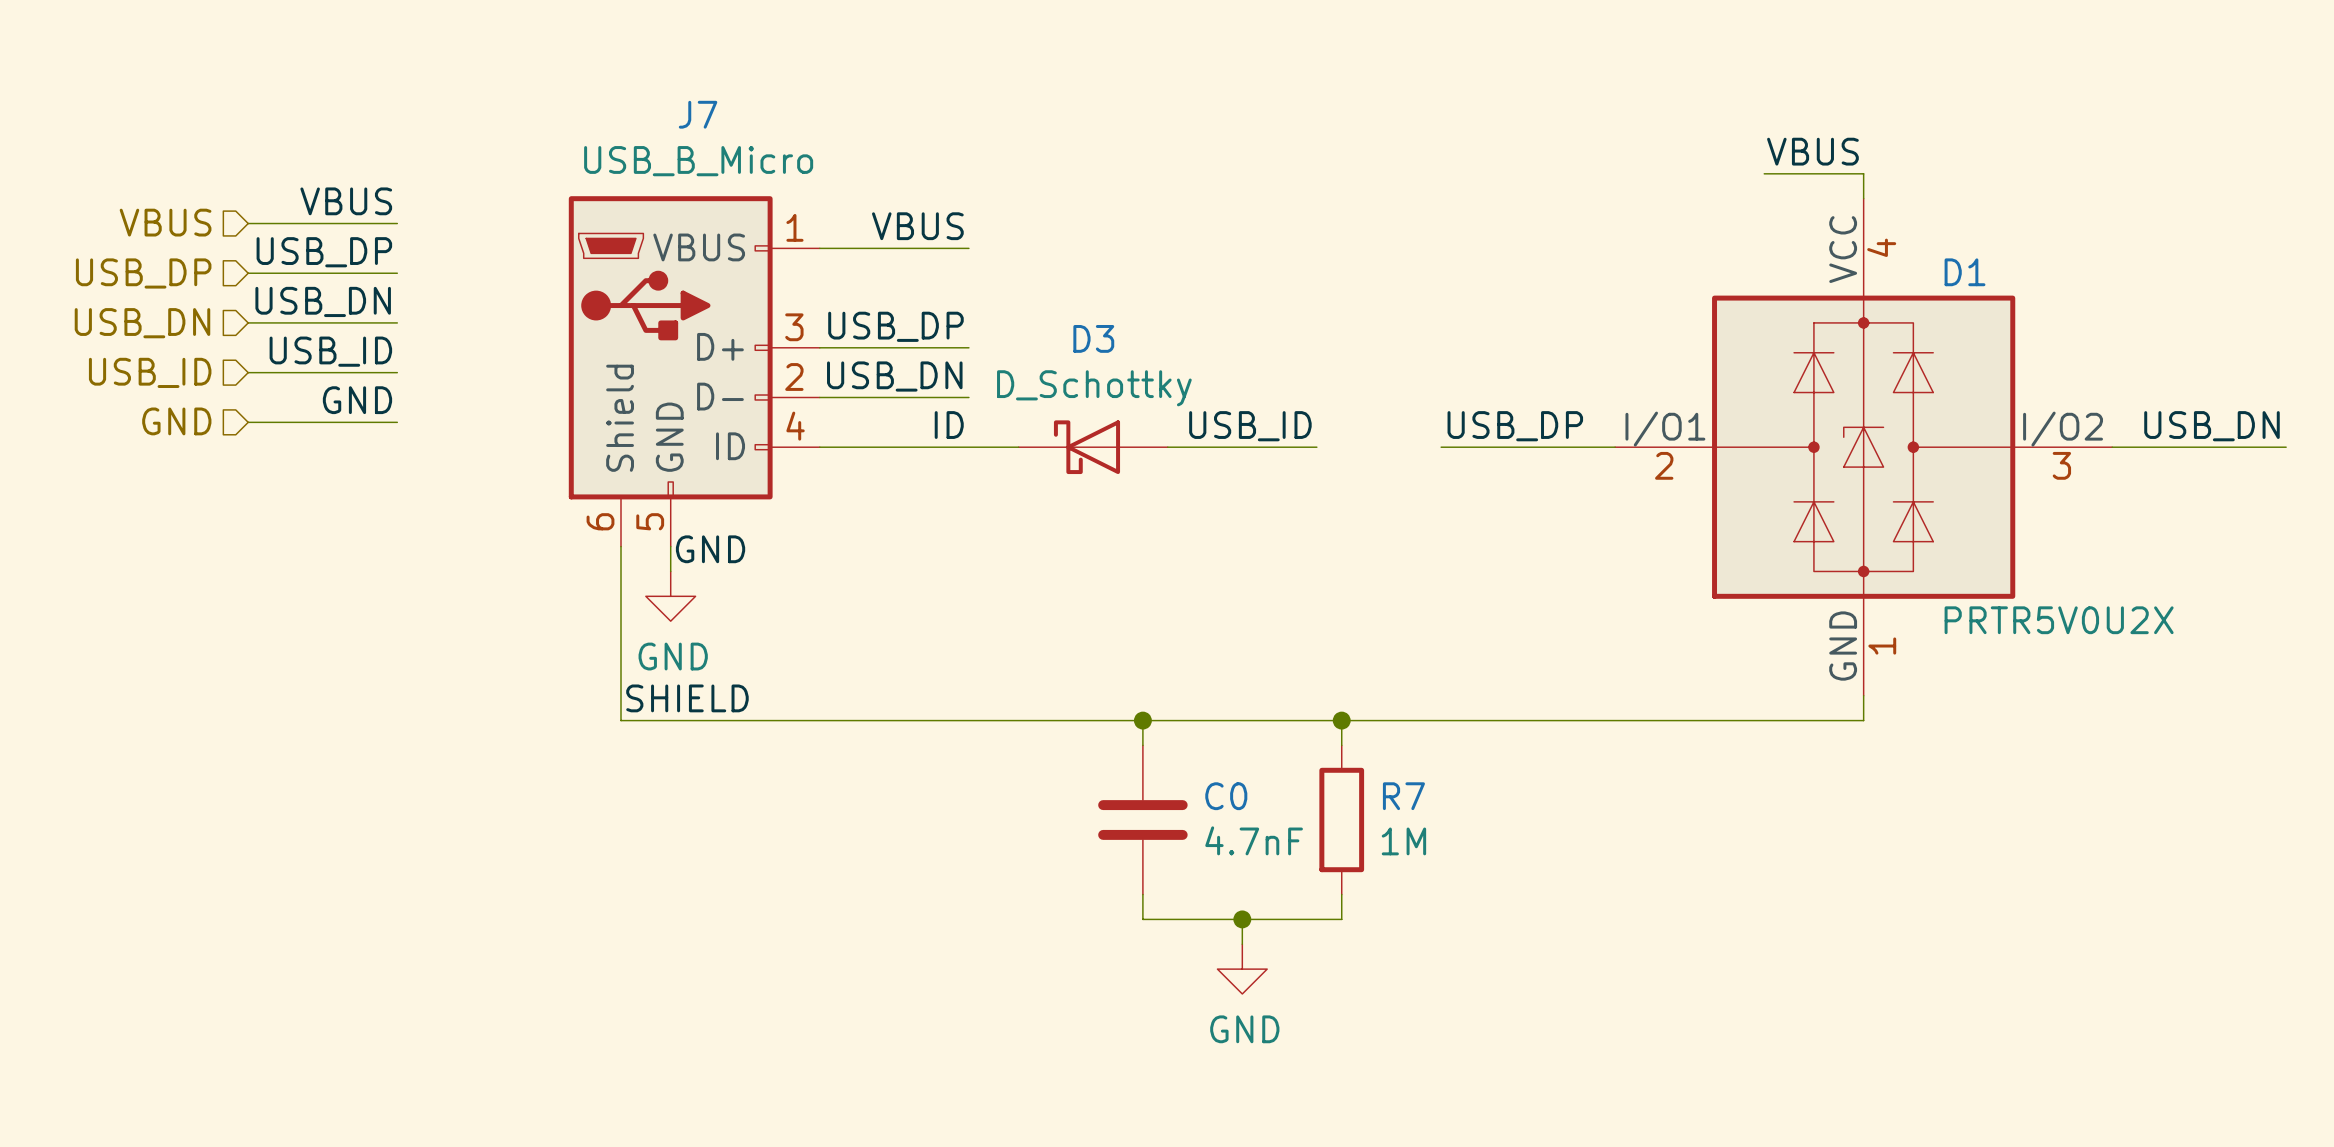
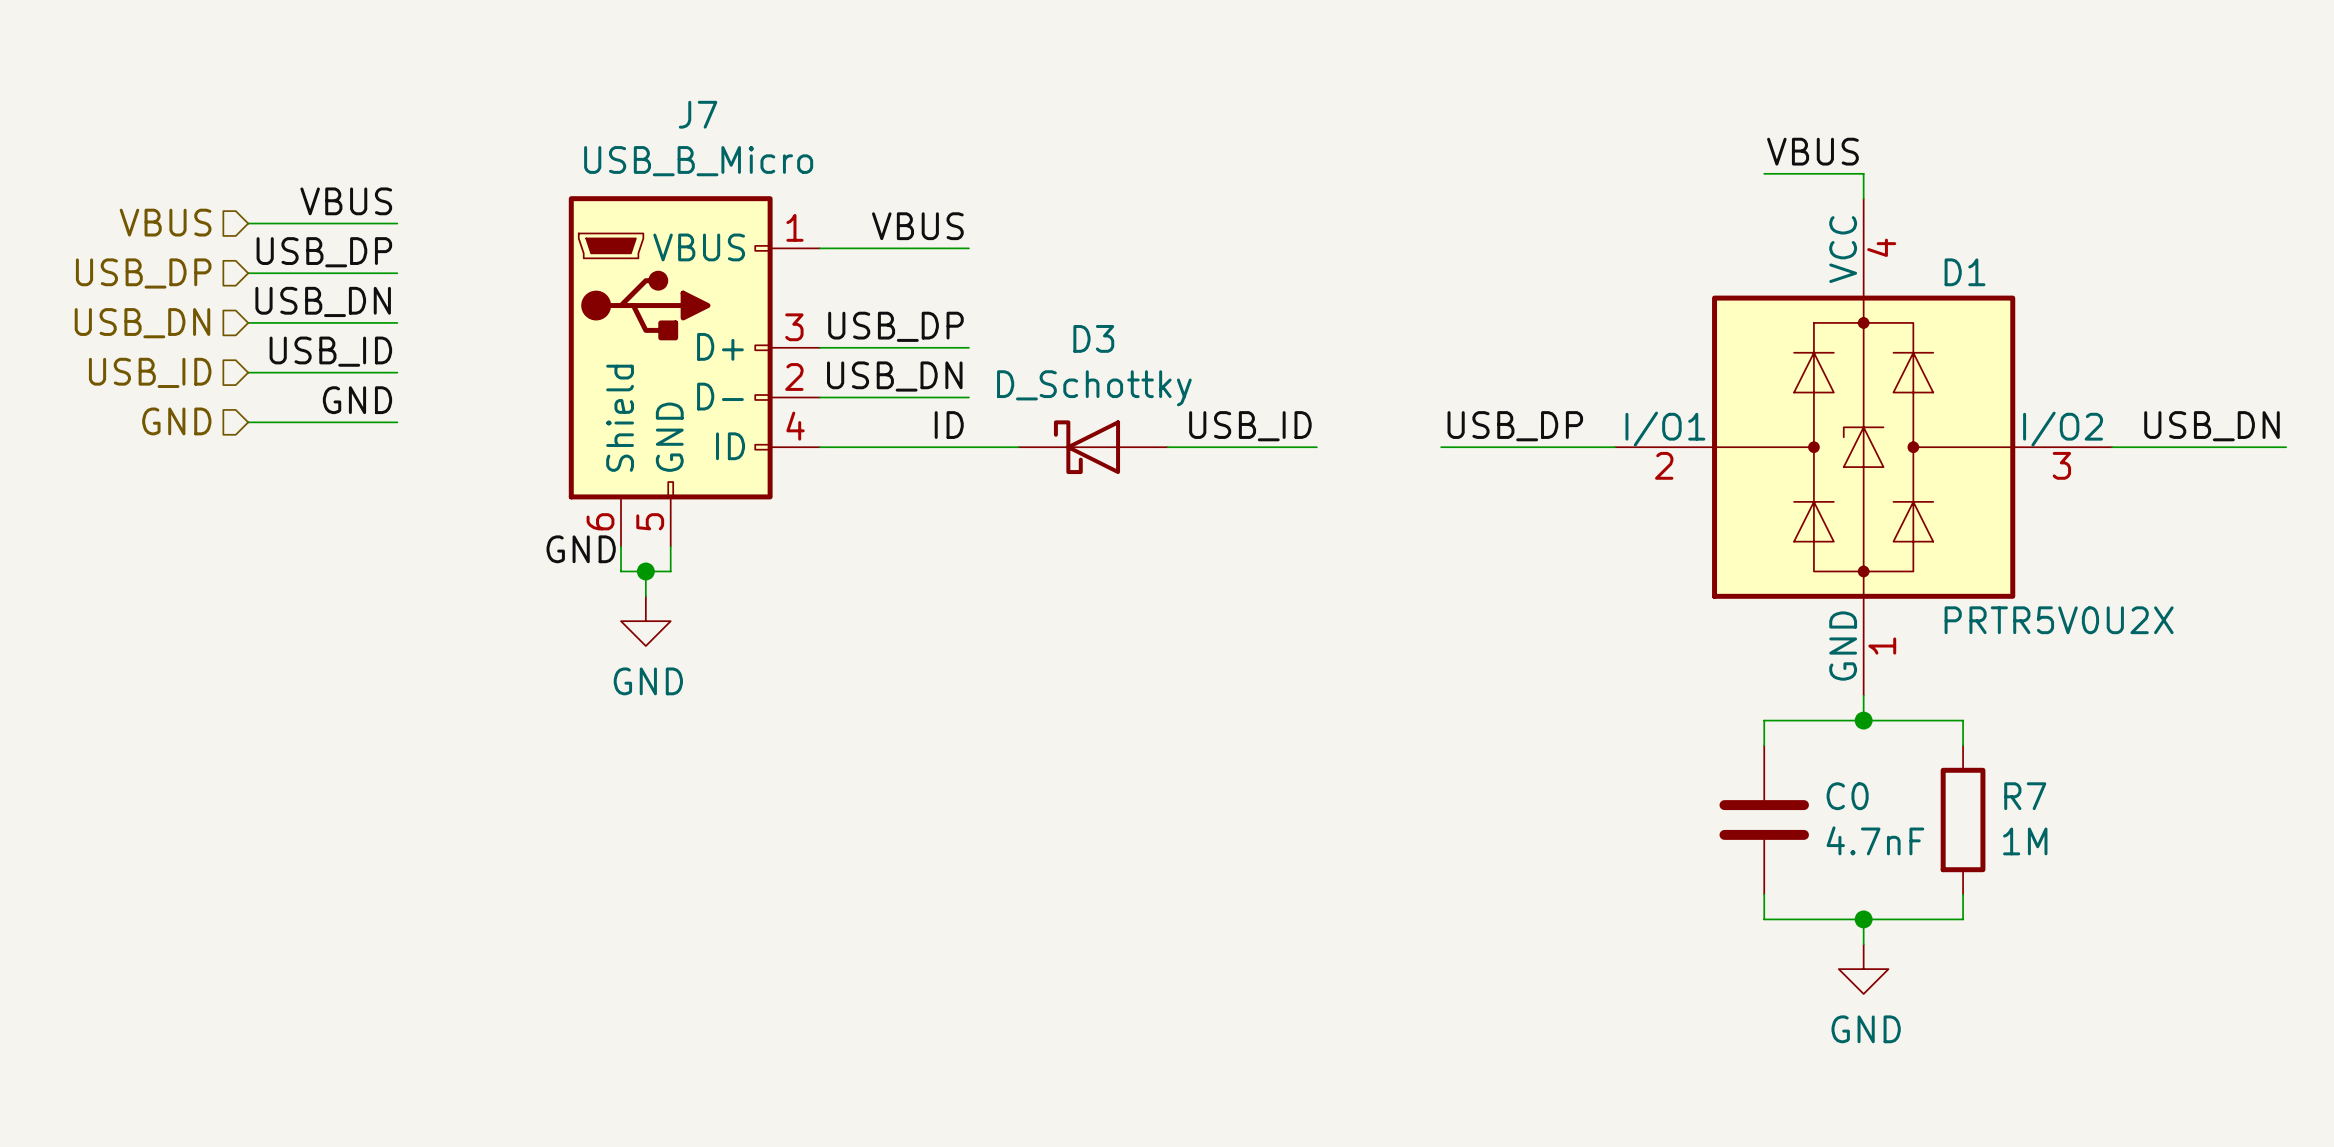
label position: GND (710, 549) -> GND (581, 549)
wire: (620, 571) (620, 720) (1764, 720) -> (620, 571) (670, 571)
wire: none -> (645, 571) (645, 596)
junction: none -> (645, 571)
power symbol position: GND (670, 596) -> GND (645, 621)
label: SHIELD (687, 698) -> none
wire: (1142, 720) (1142, 745) -> none
junction: (1142, 720) -> none
wire: (1341, 720) (1341, 745) -> (1764, 720) (1764, 745)
junction: (1341, 720) -> none
wire: none -> (1863, 720) (1963, 720) (1963, 745)
junction: none -> (1863, 720)
C0 position: (1142, 820) -> (1764, 820)
R7 position: (1341, 820) -> (1963, 820)
wire: (1142, 894) (1142, 919) (1341, 919) (1341, 894) -> none
wire: none -> (1764, 894) (1764, 919) (1963, 919) (1963, 894)
wire: (1242, 919) (1242, 944) -> none
junction: (1242, 919) -> none
wire: none -> (1863, 919) (1863, 944)
junction: none -> (1863, 919)
power symbol: GND (1242, 969) -> none
power symbol: none -> GND (1863, 969)

